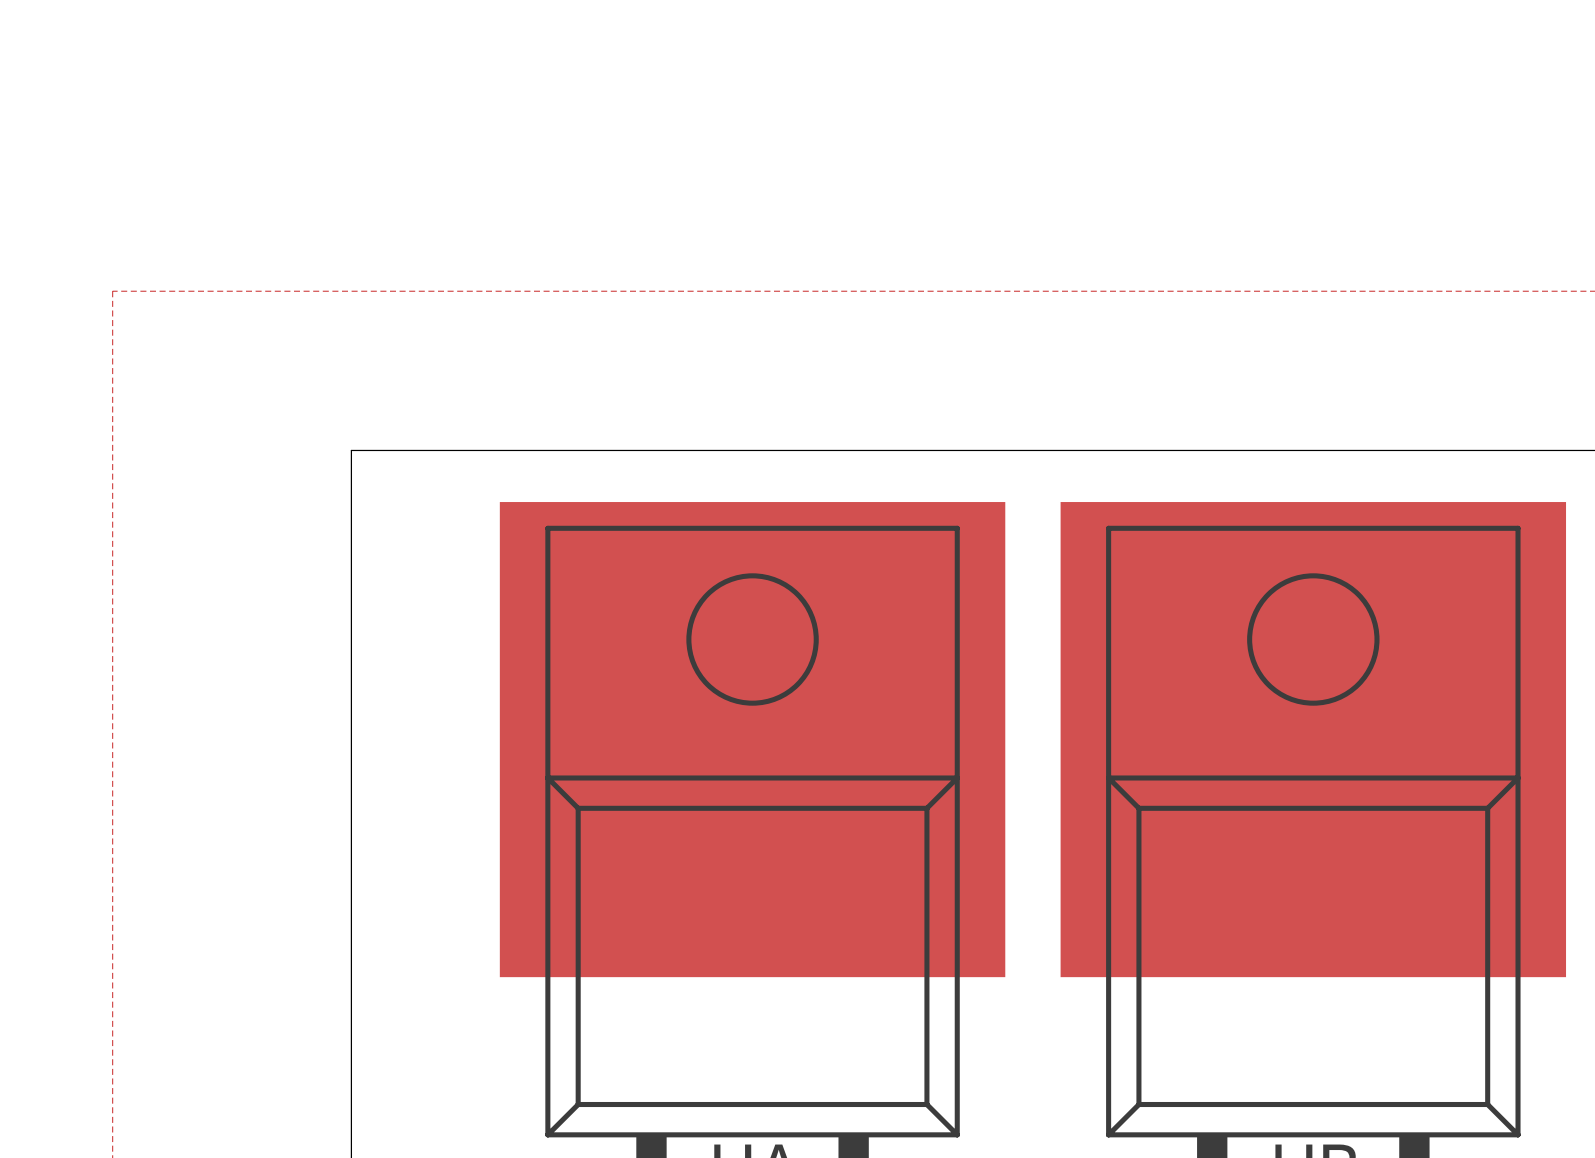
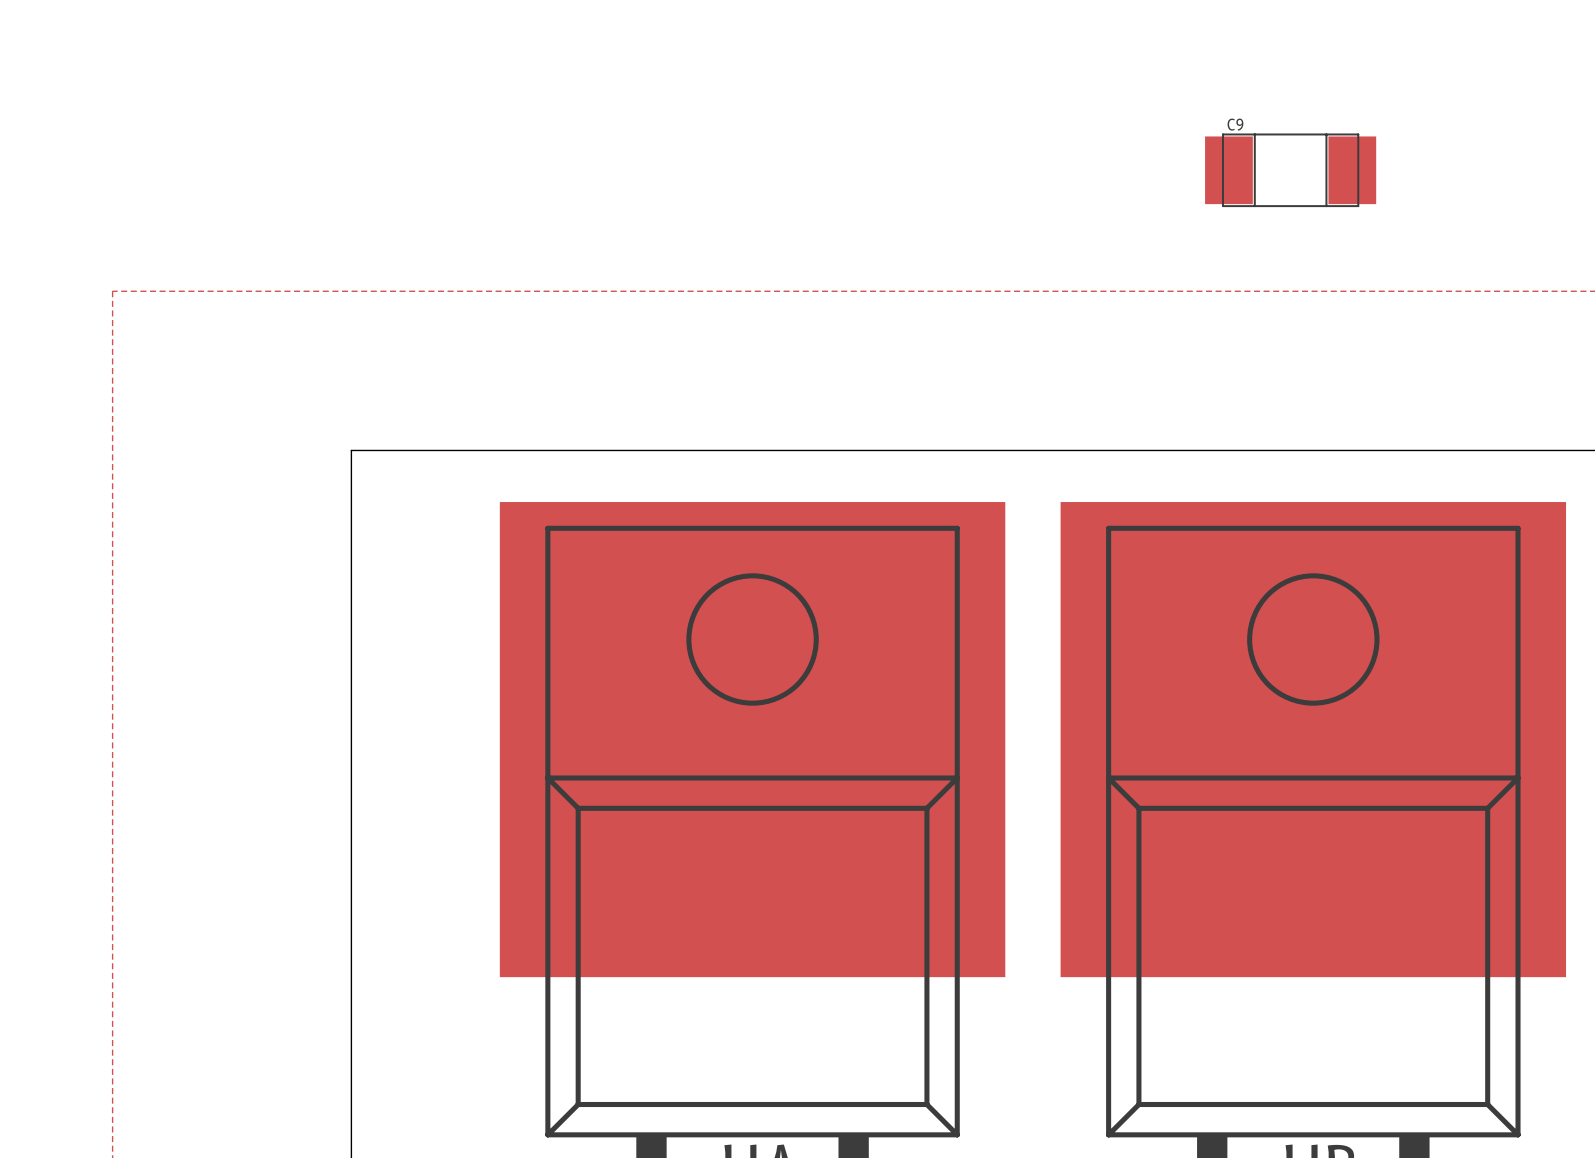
C9: none -> (1290, 170)

